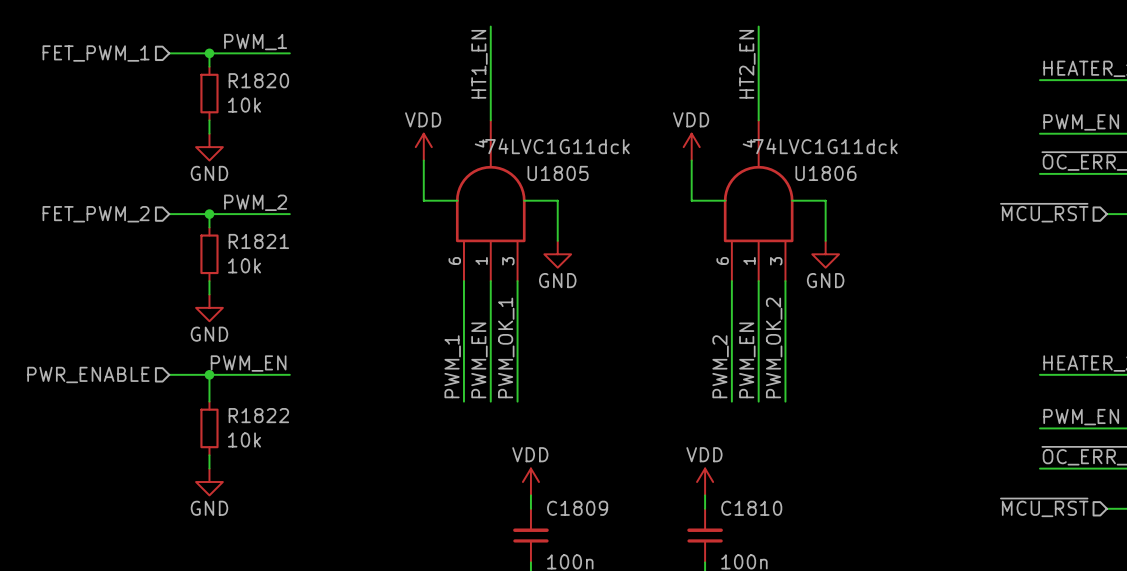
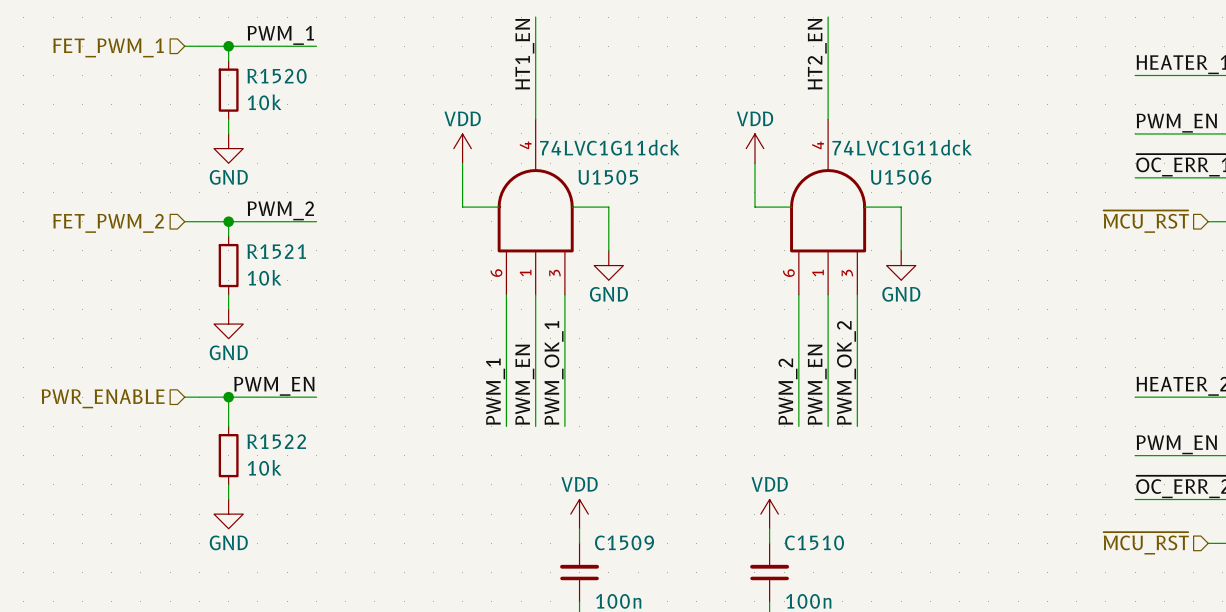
R1820 name: R1820 (258, 80) -> R1520 (276, 76)
U1805 name: U1805 (558, 173) -> U1505 (608, 177)
U1806 name: U1806 (825, 173) -> U1506 (901, 177)
R1821 name: R1821 (258, 241) -> R1521 (276, 251)
R1822 name: R1822 (258, 415) -> R1522 (276, 441)
C1809 name: C1809 (577, 508) -> C1509 (624, 542)
C1810 name: C1810 (751, 508) -> C1510 (814, 542)

